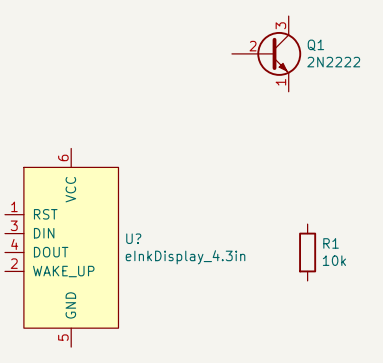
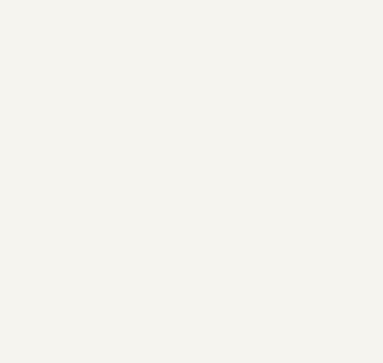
Q1: 2N2222 (266, 53) -> none
U?: eInkDisplay_4.3in (61, 247) -> none
R1: 10k (307, 252) -> none

